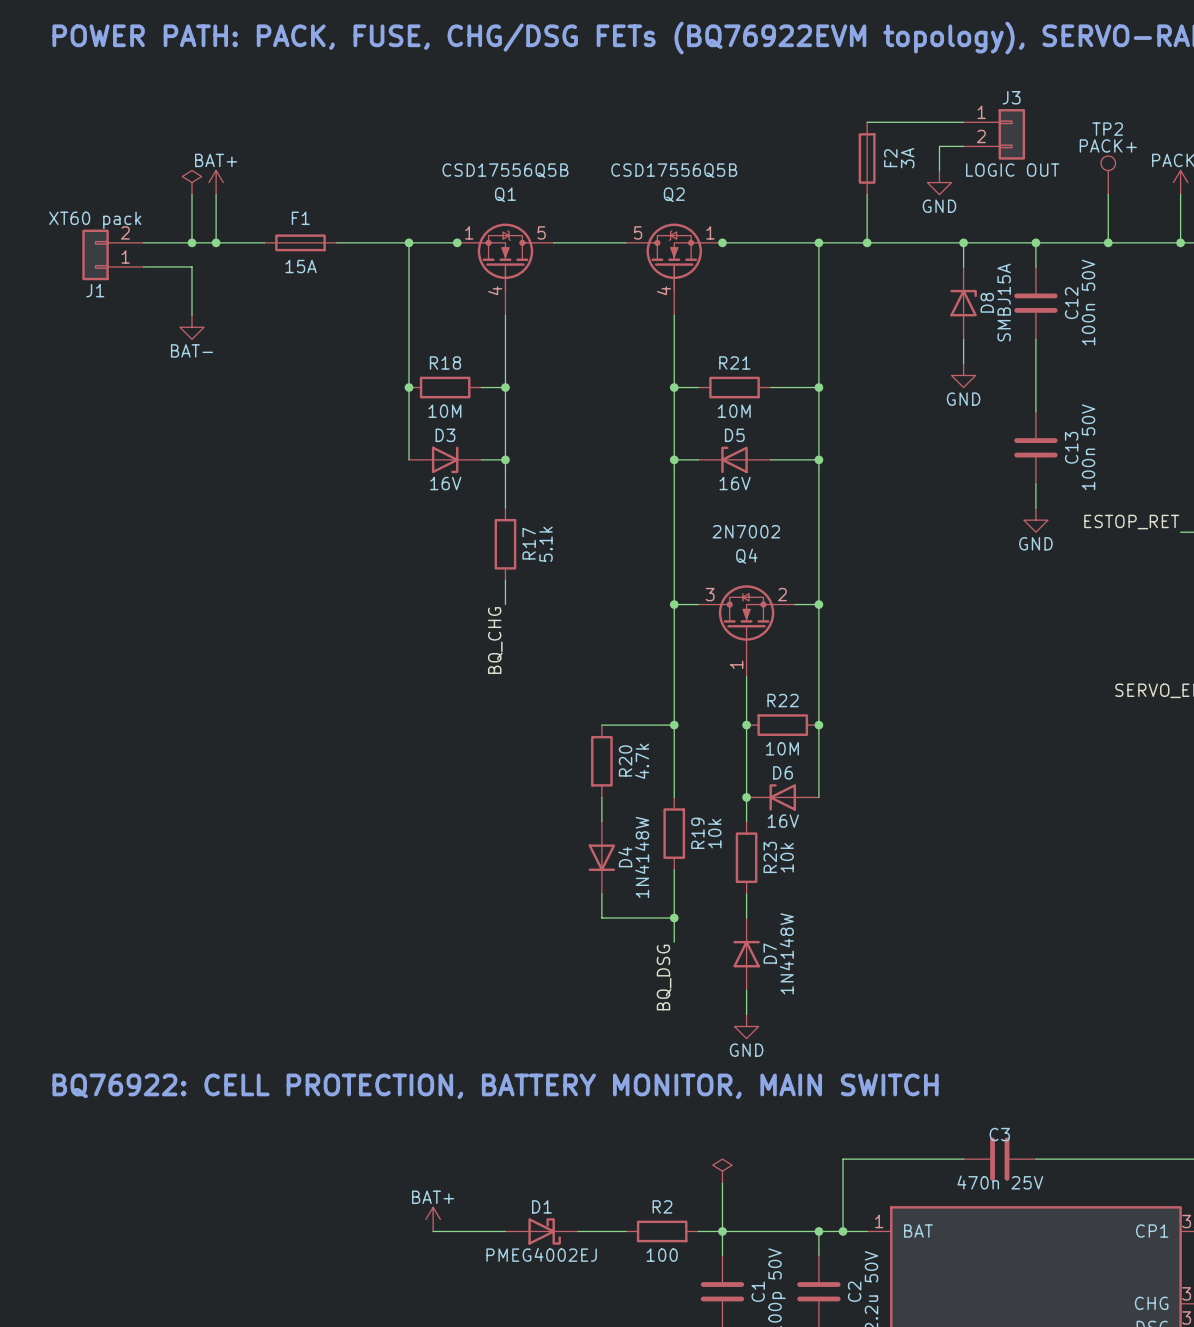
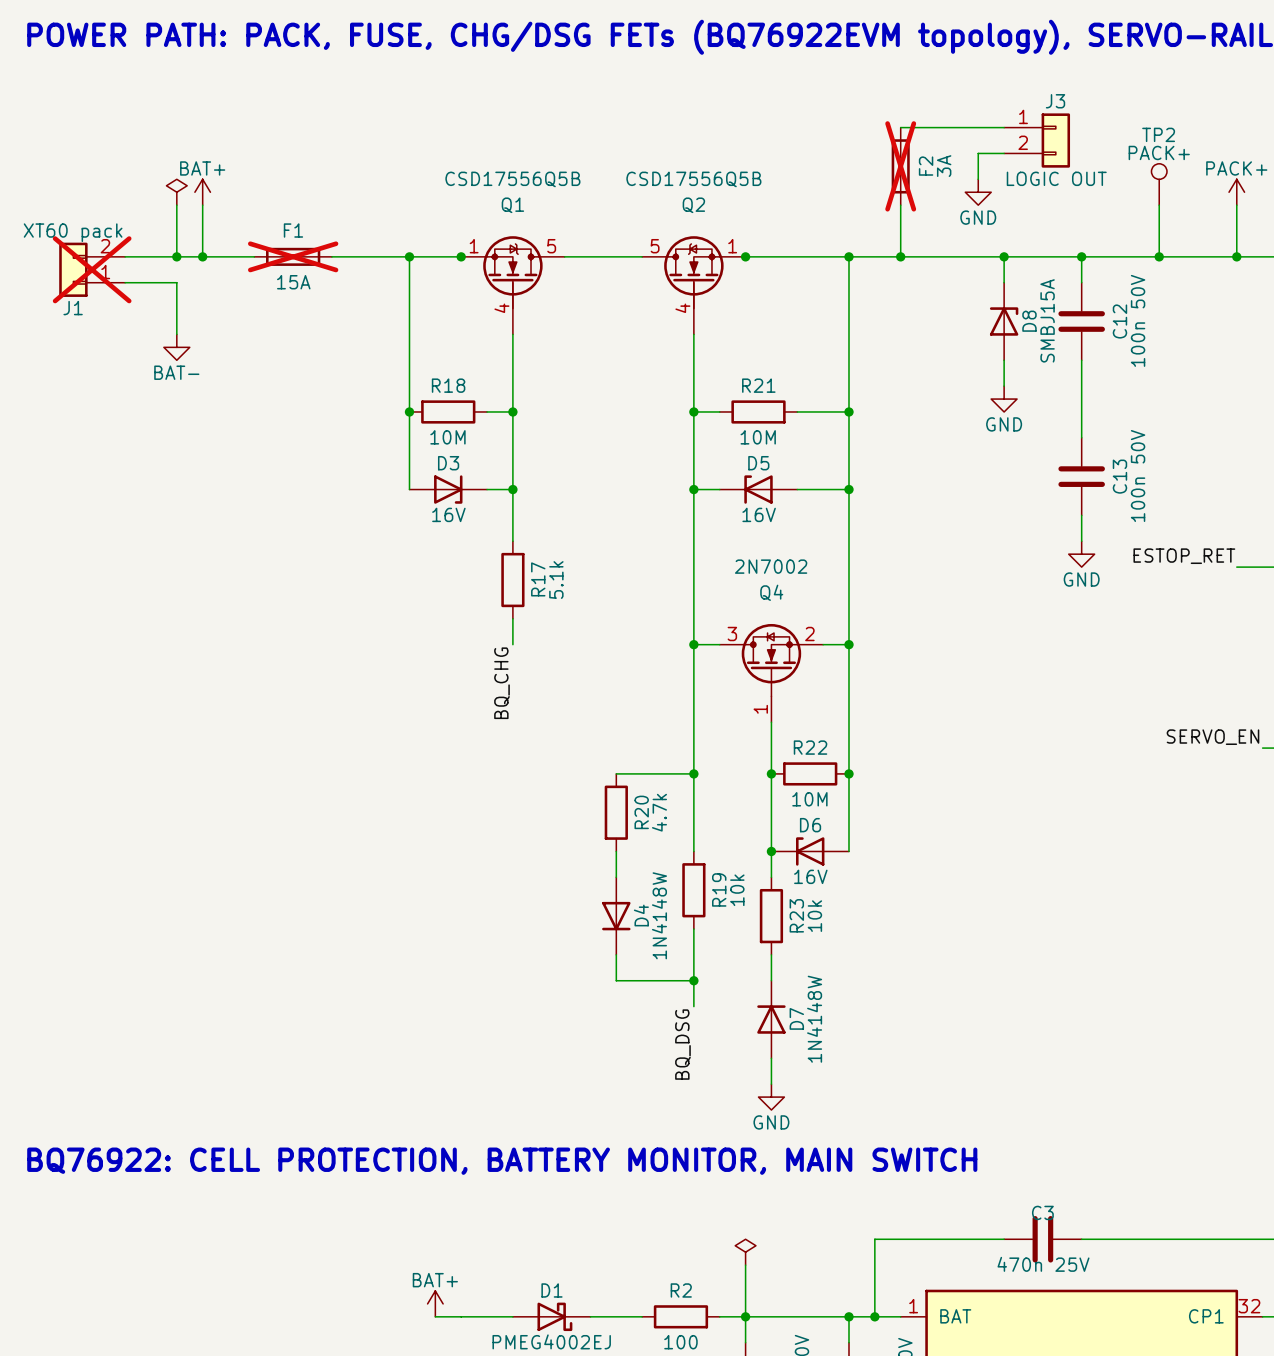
F2 do-not-place cross: none -> (900, 166)
F1 do-not-place cross: none -> (293, 256)
J1 do-not-place cross: none -> (92, 269)

